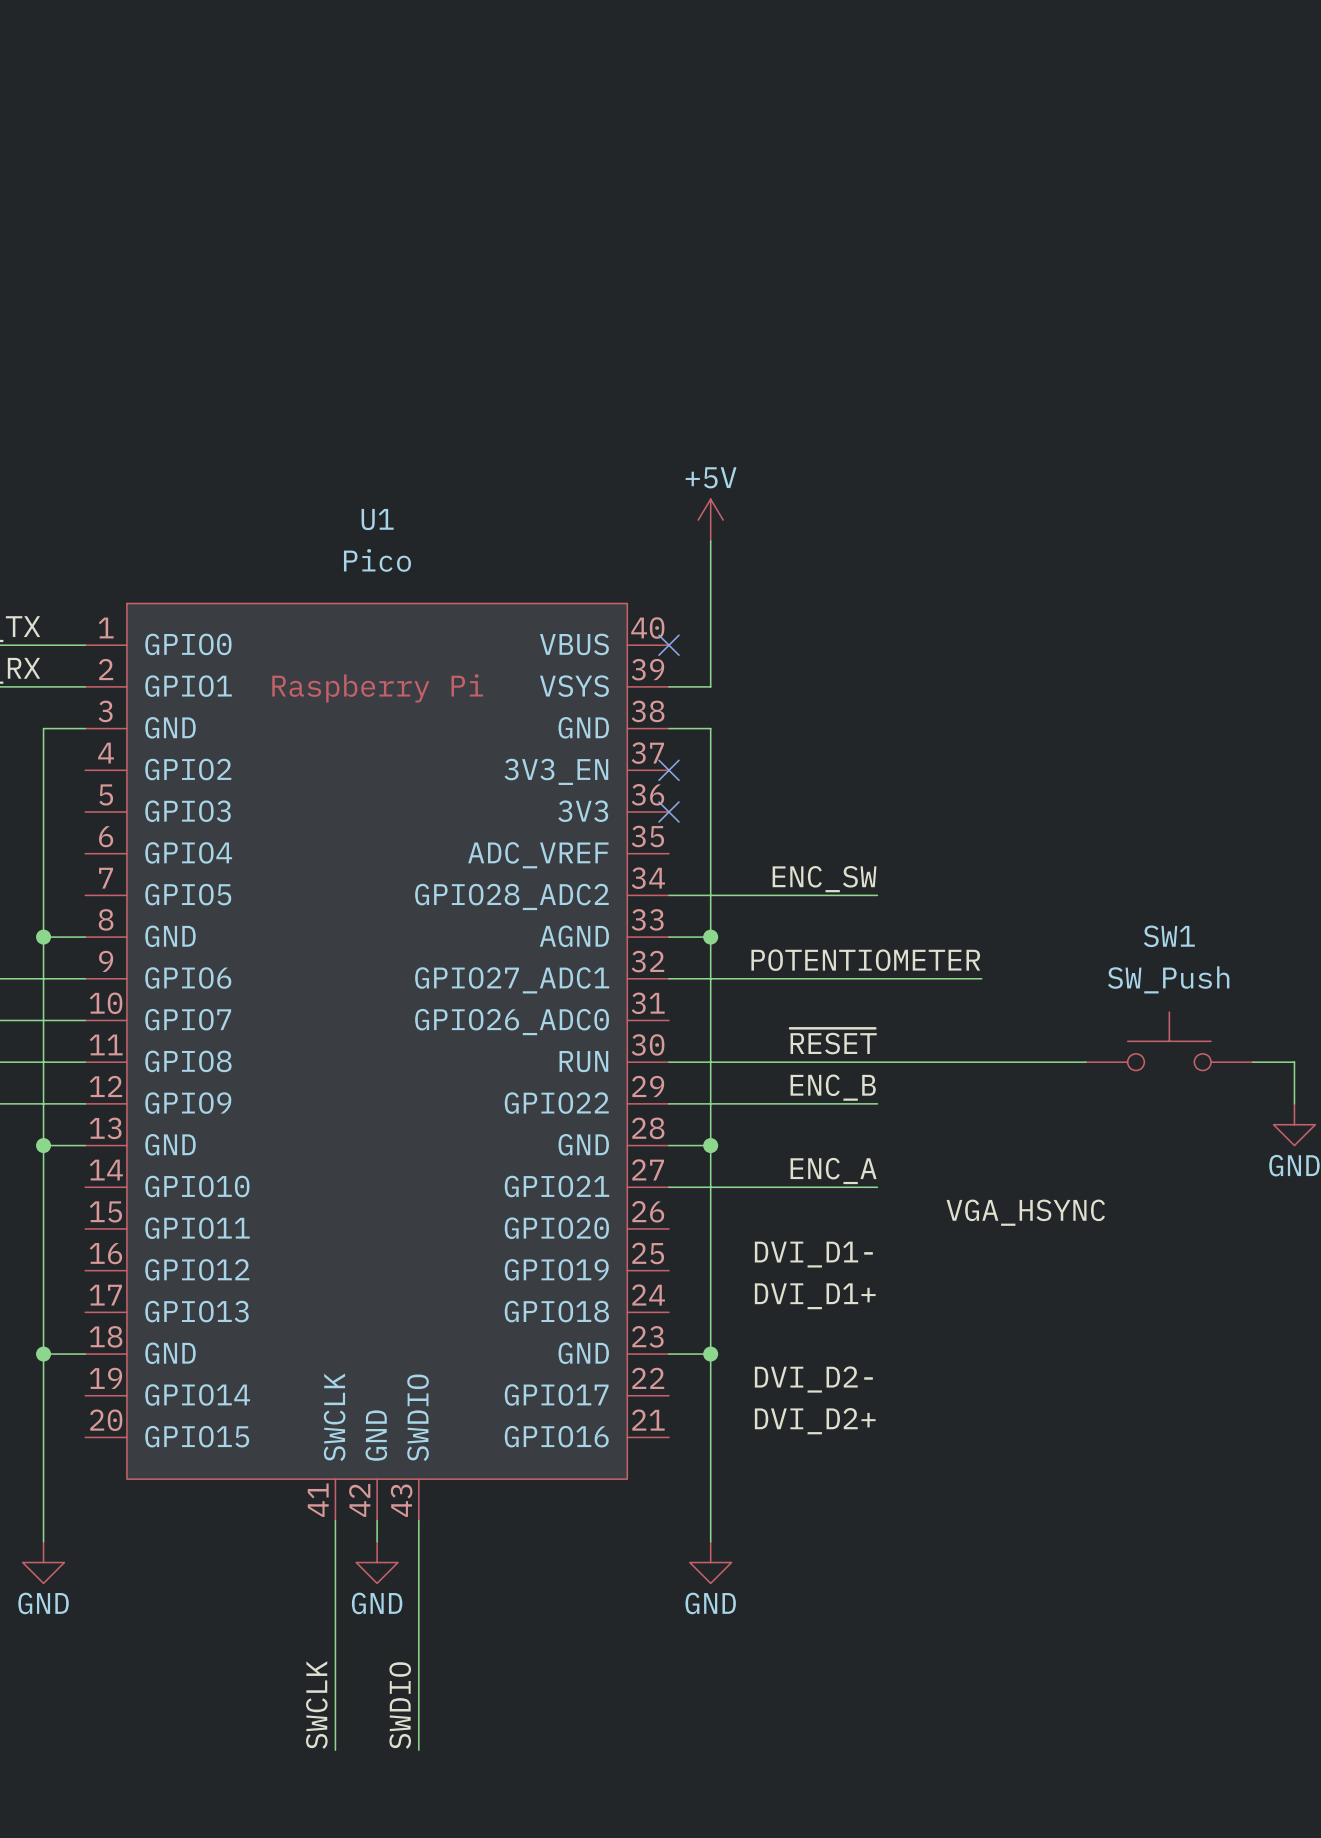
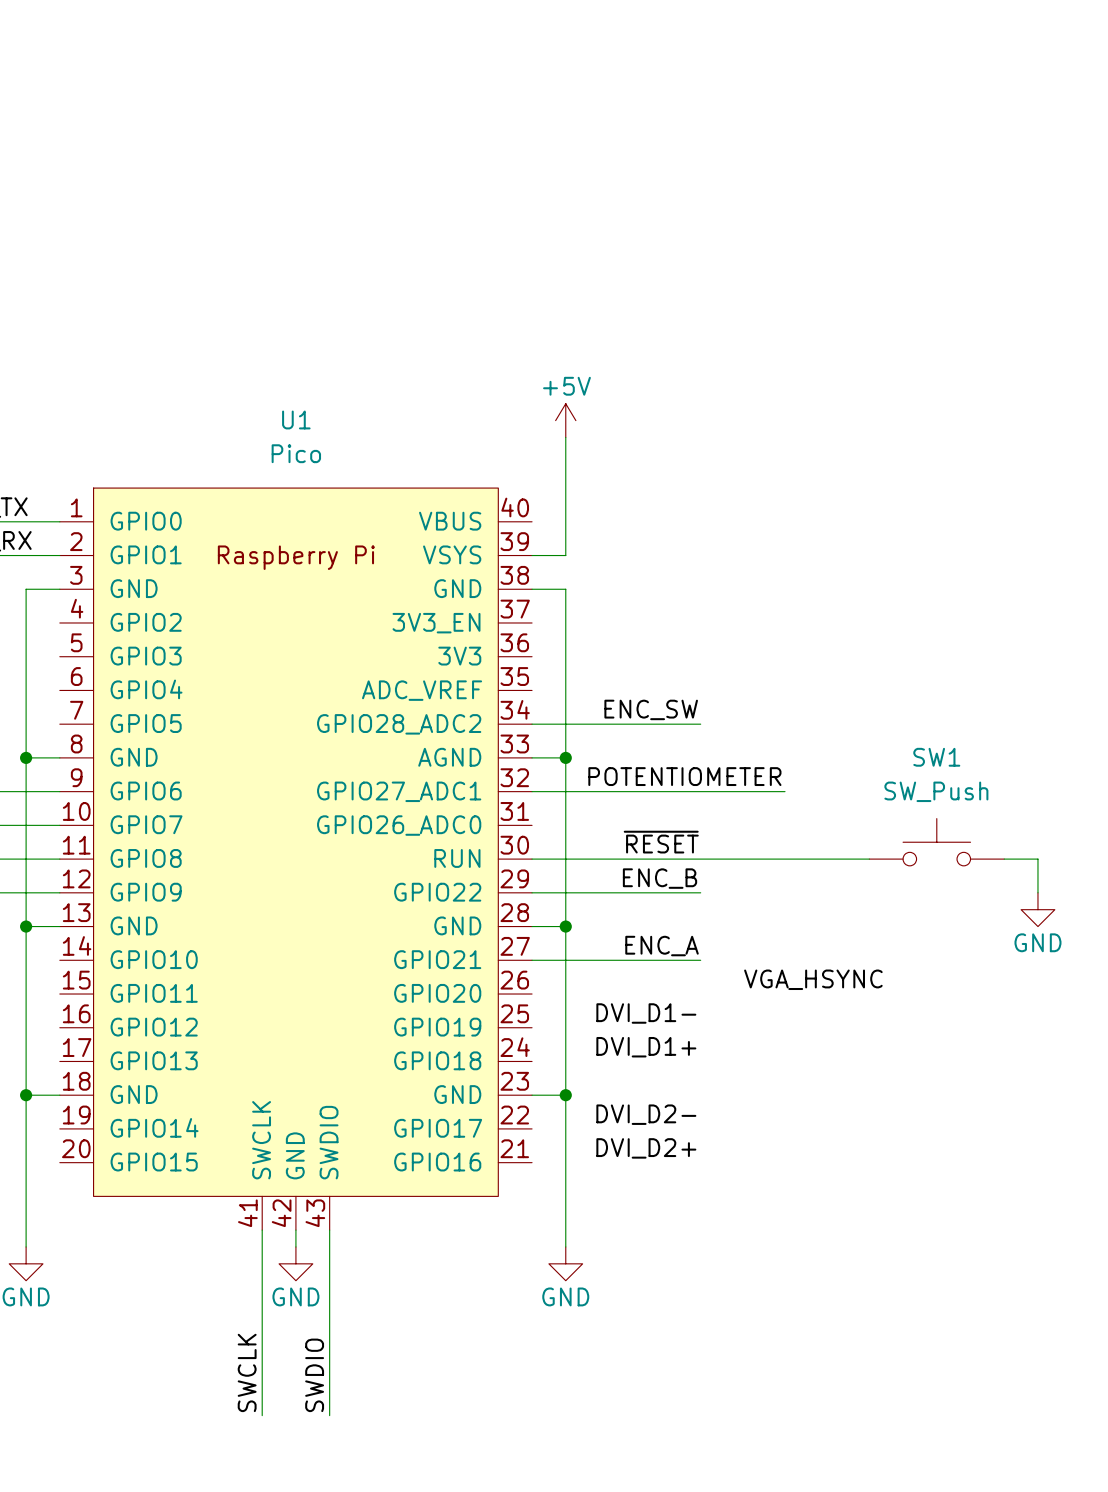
no-connect mark: (668, 645) -> none
no-connect mark: (668, 770) -> none
no-connect mark: (668, 811) -> none

